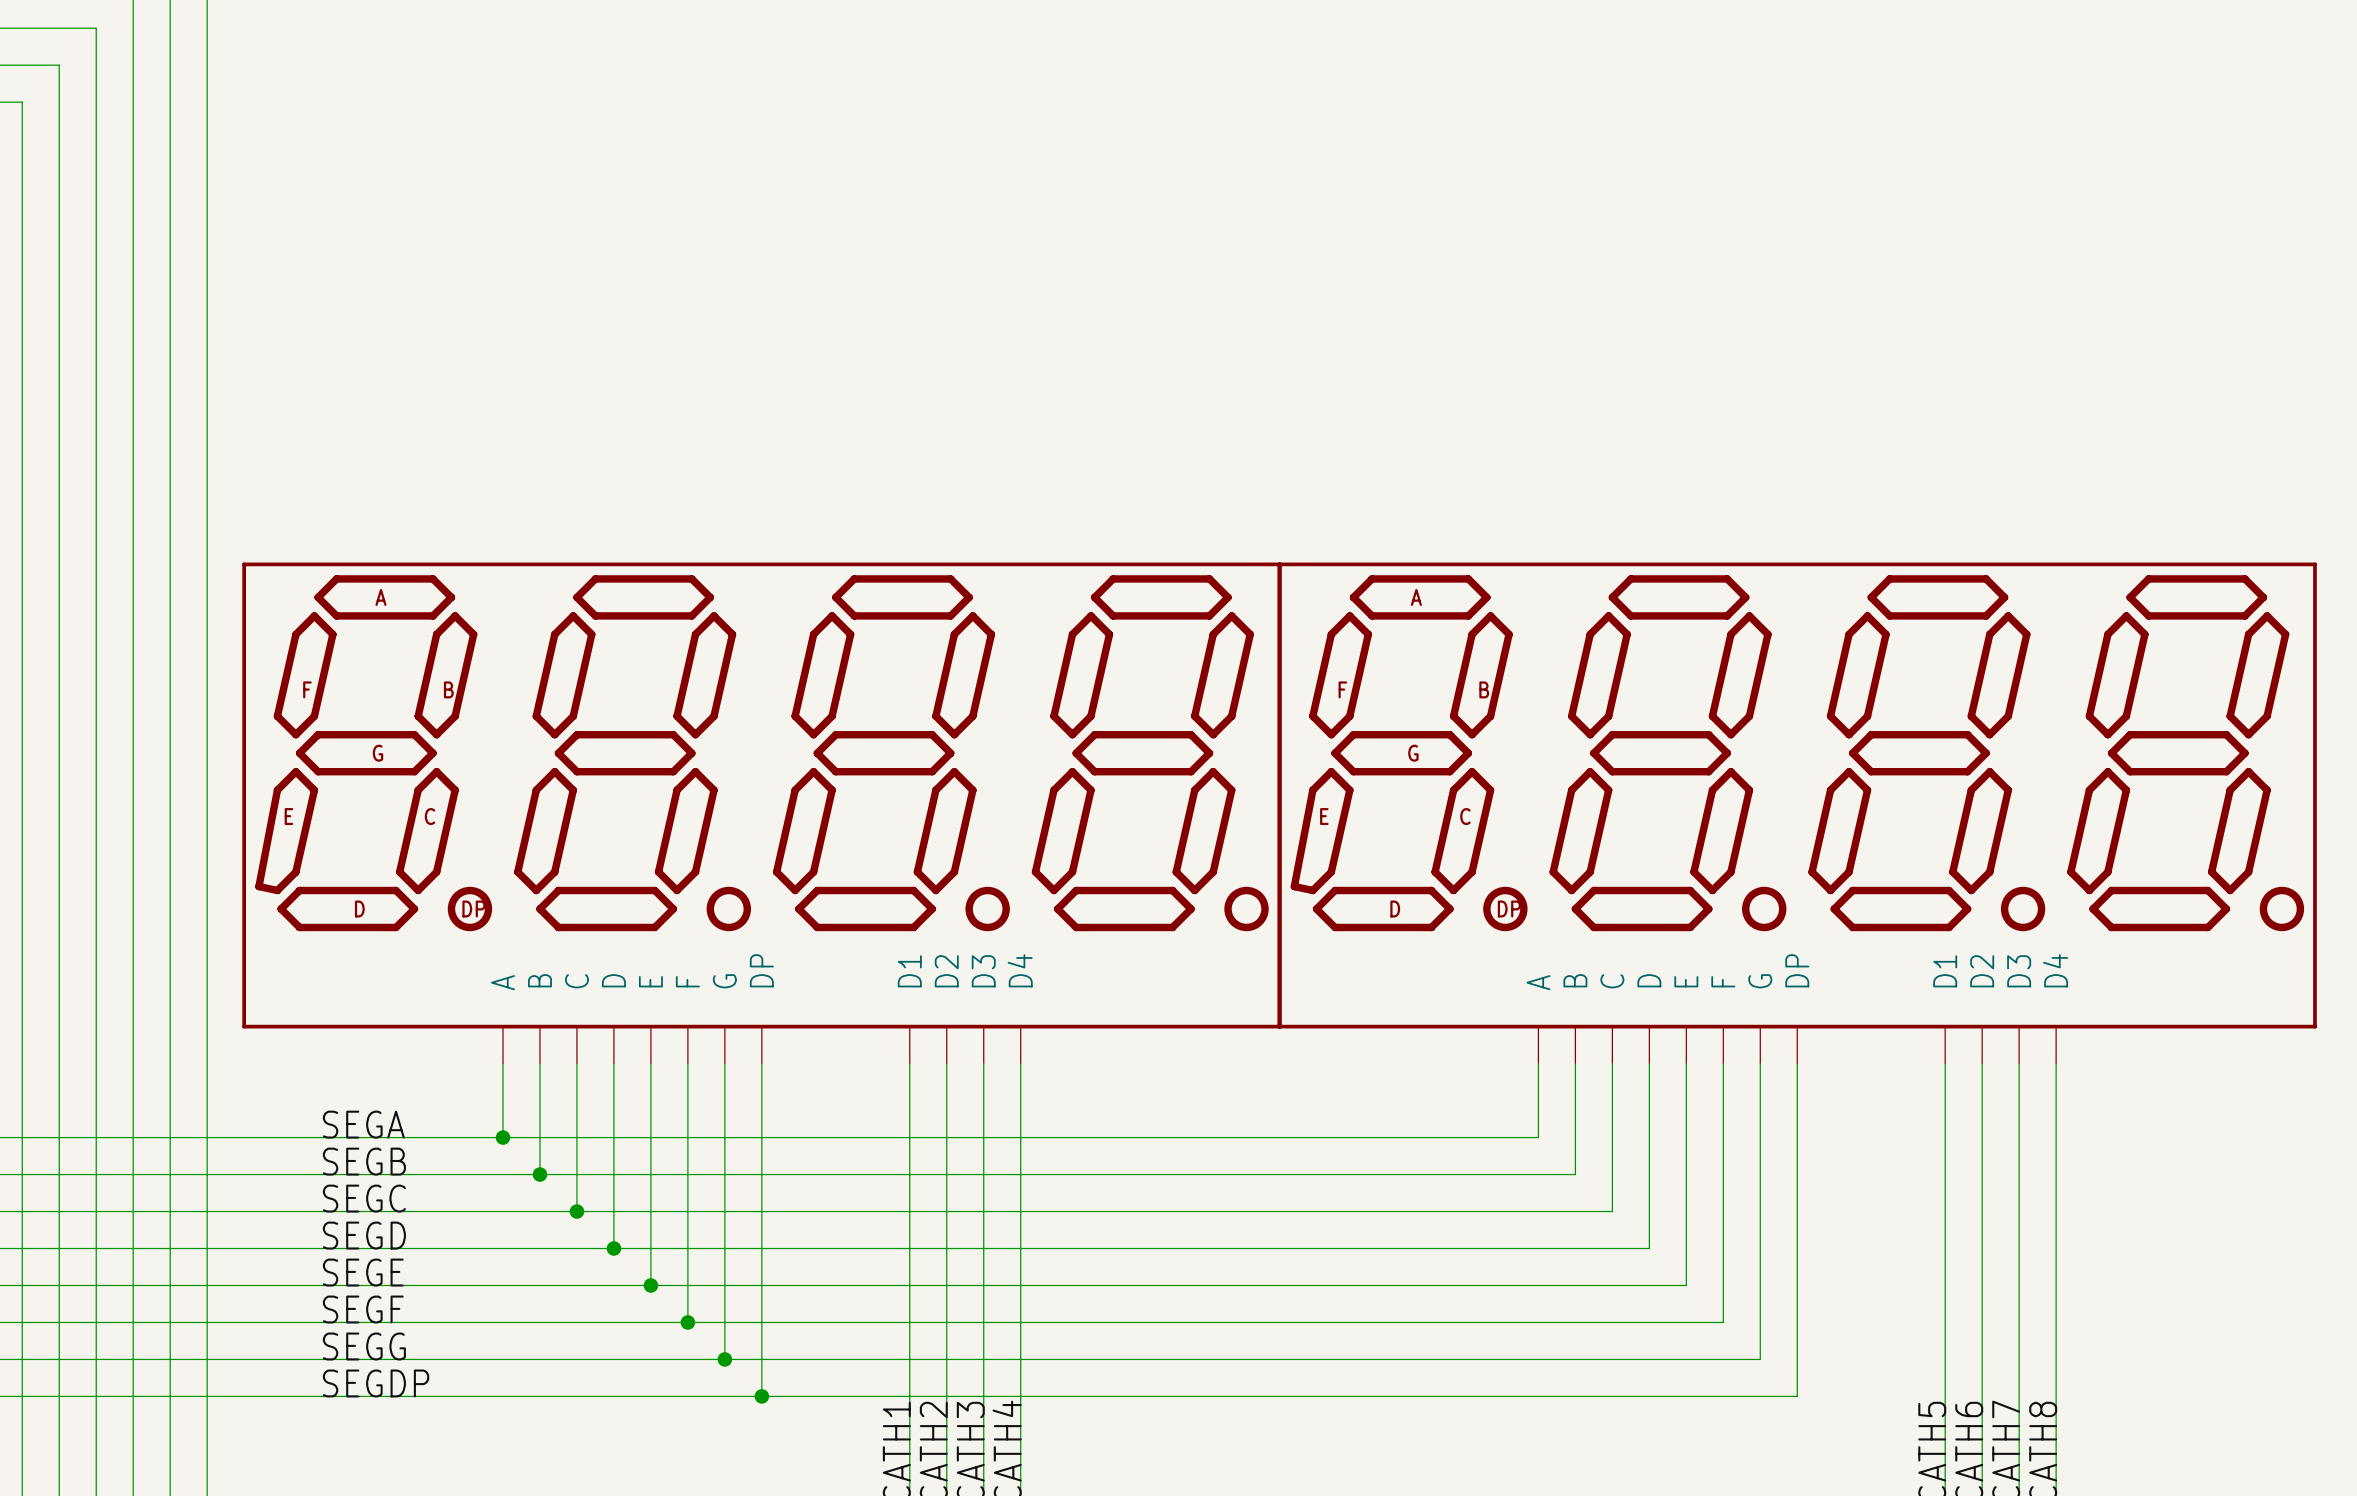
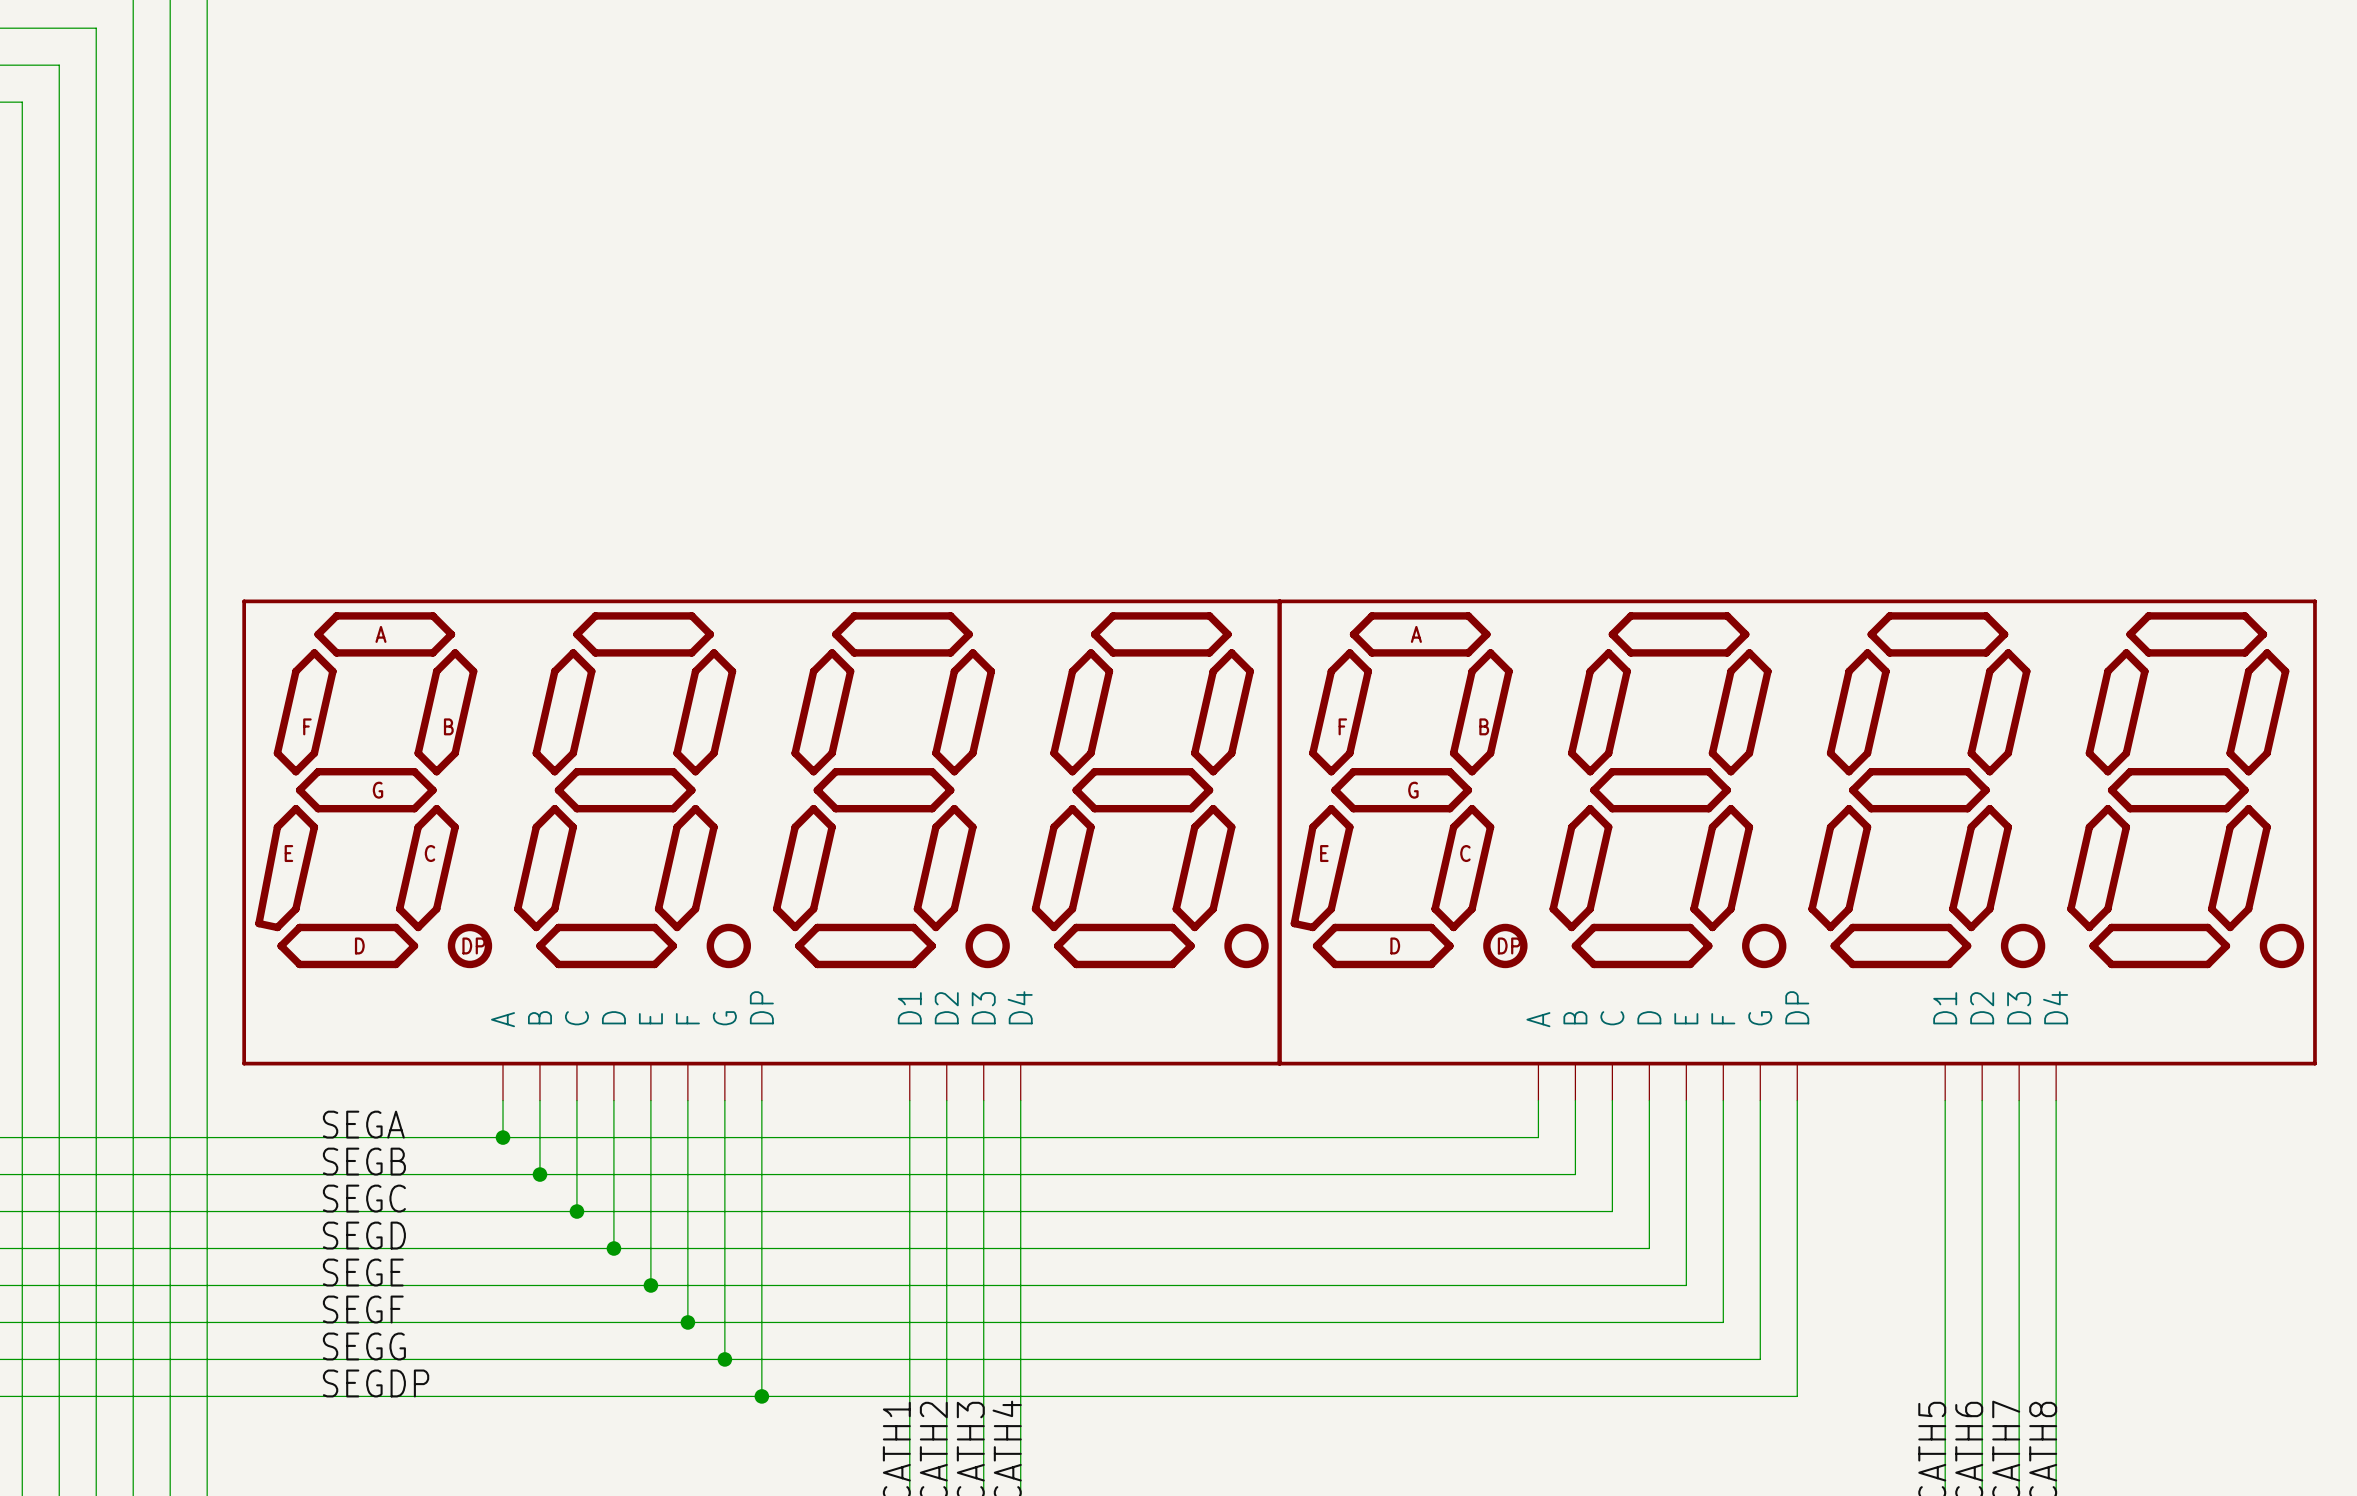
part position: (761, 813) -> (761, 850)
part position: (1797, 813) -> (1797, 850)

